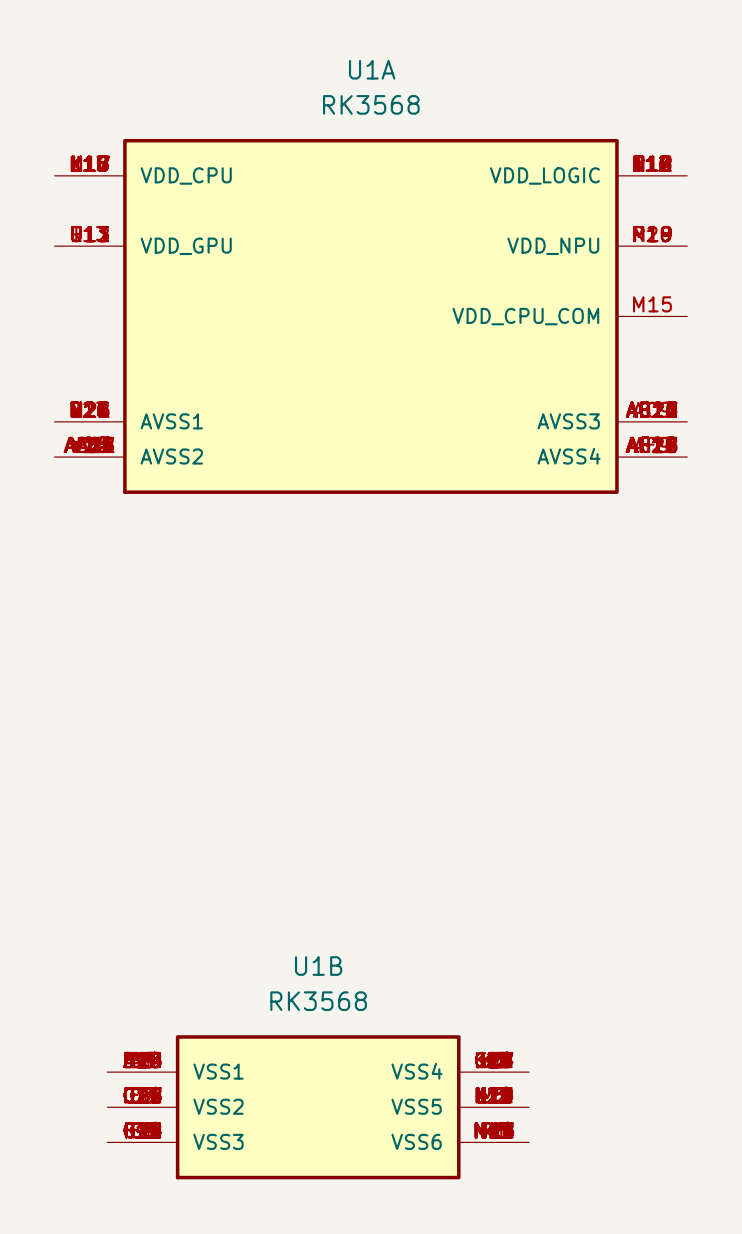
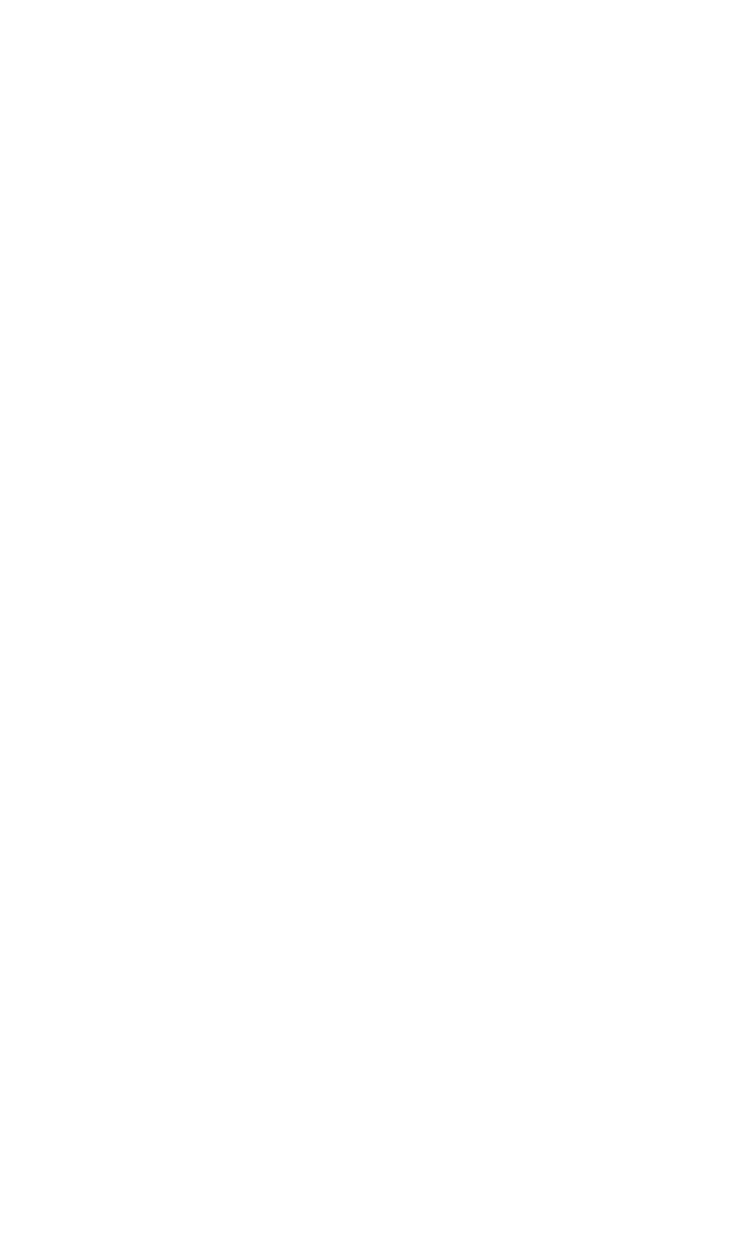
U1A: RK3568 (370, 316) -> none
U1B: RK3568 (318, 1107) -> none

